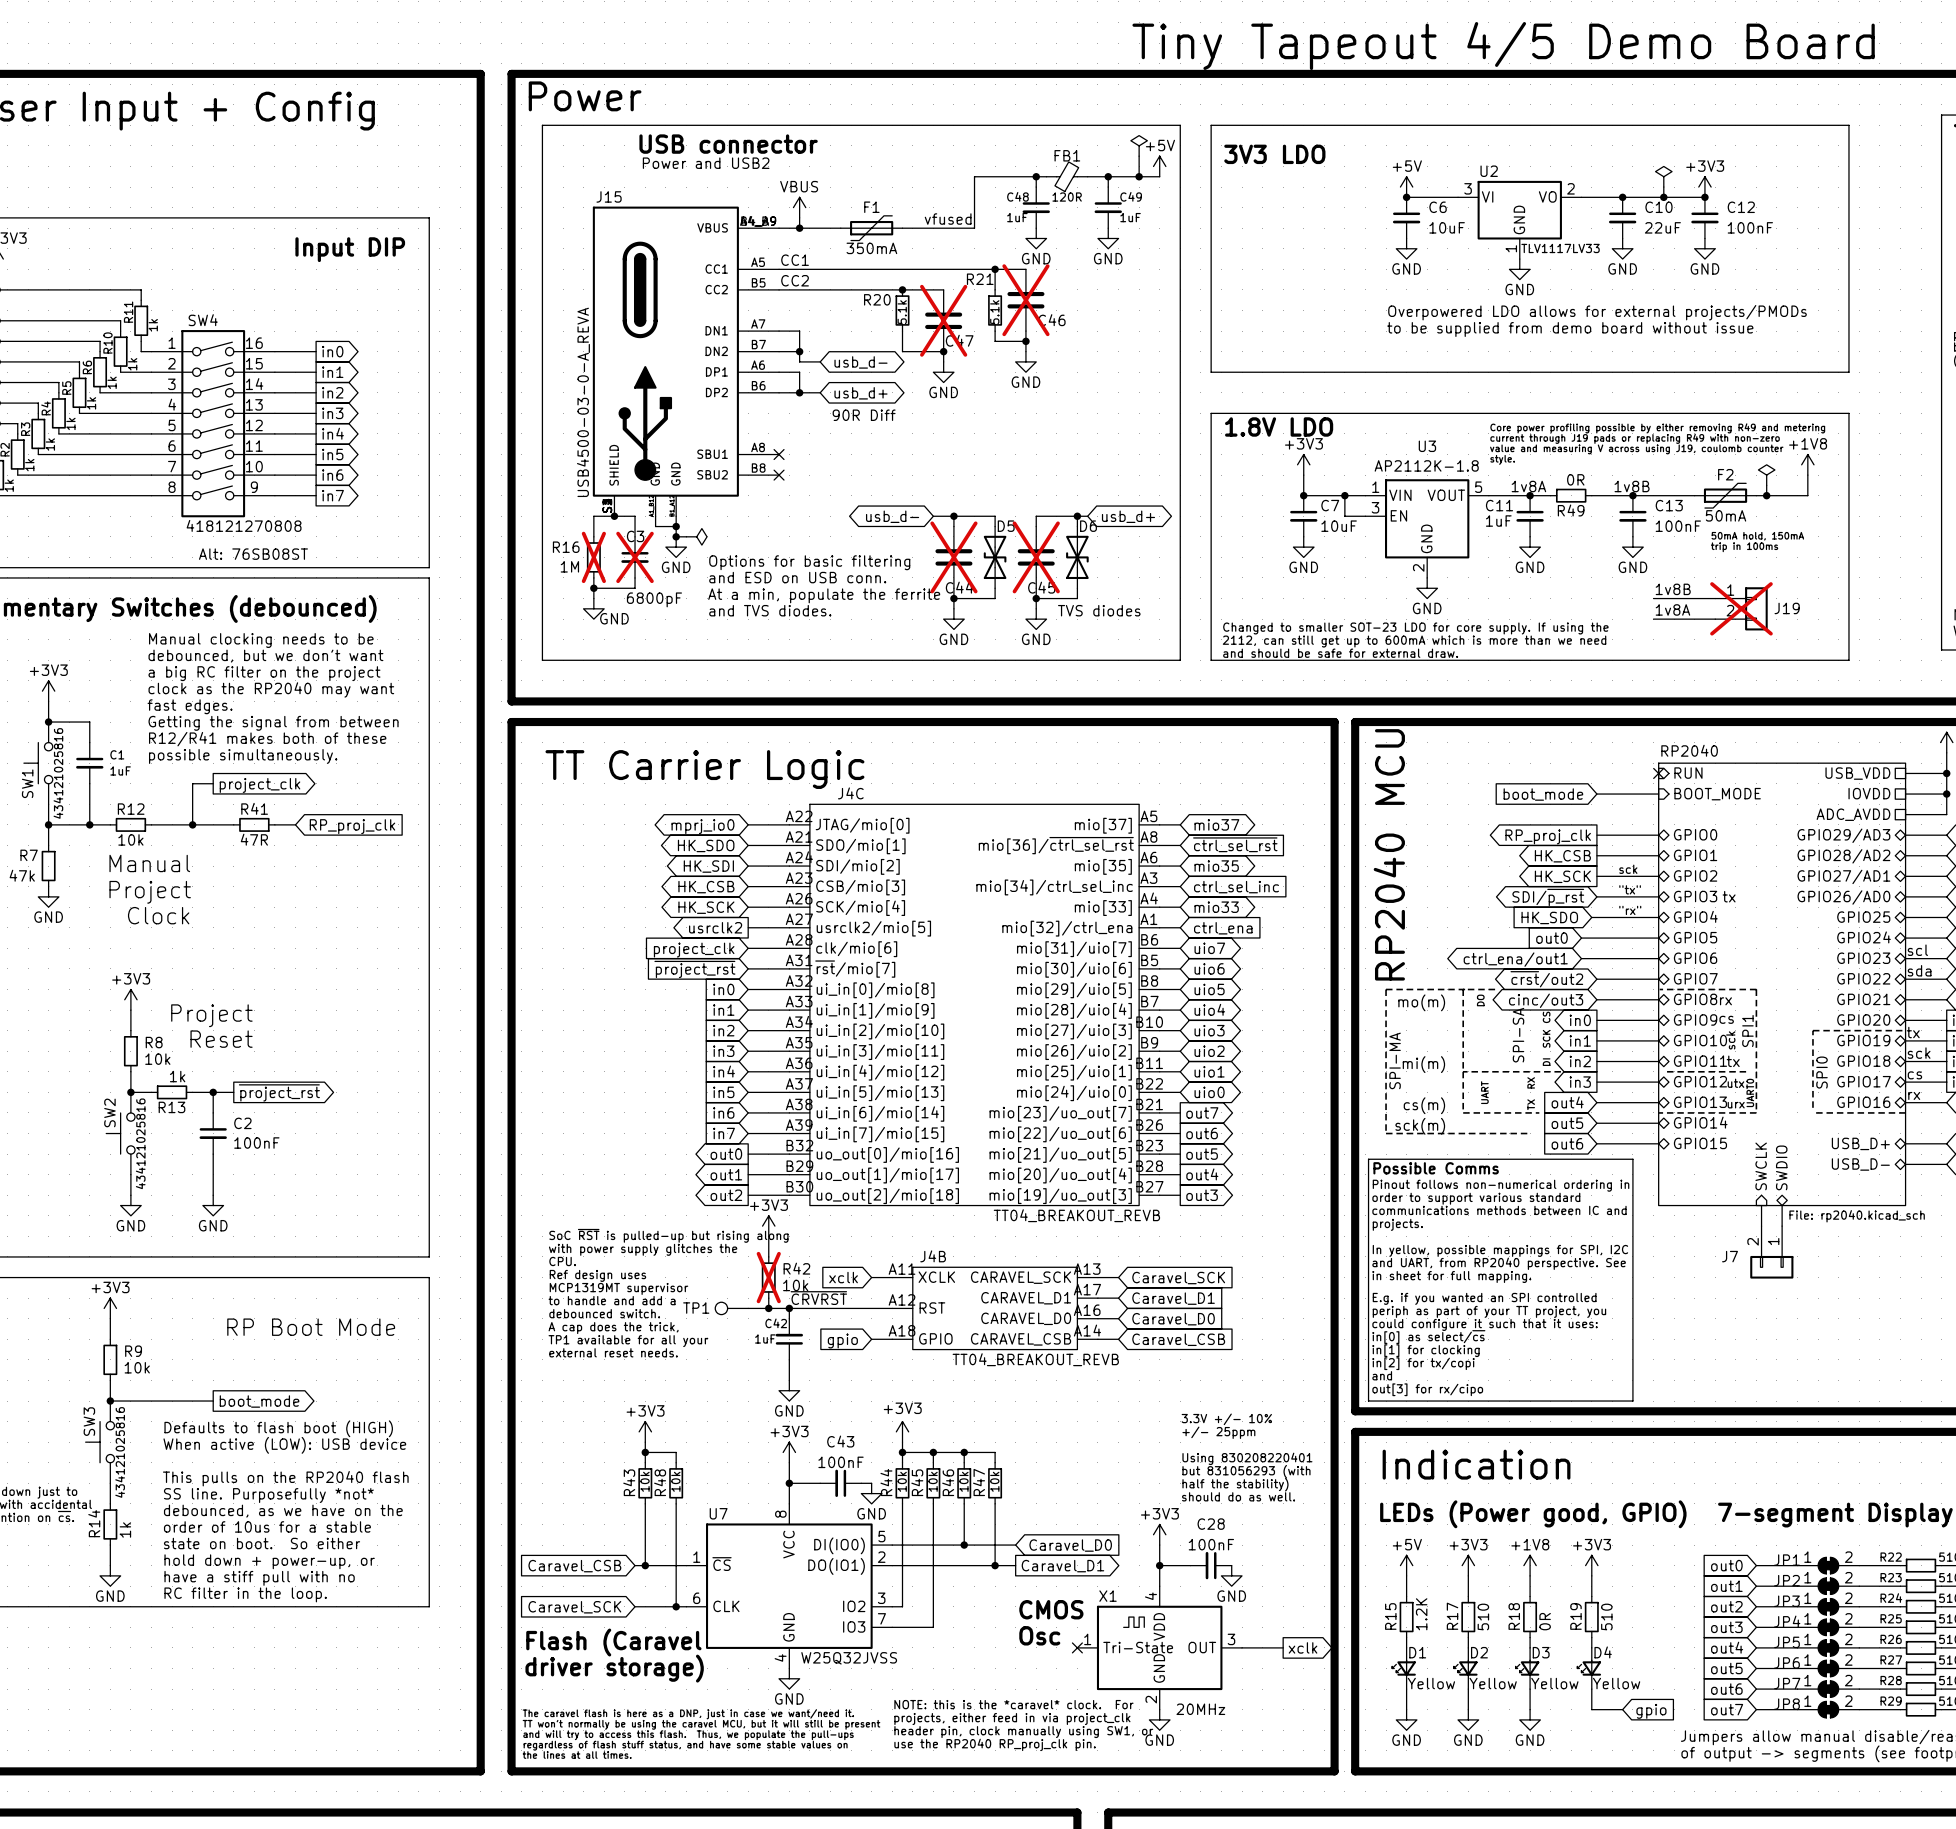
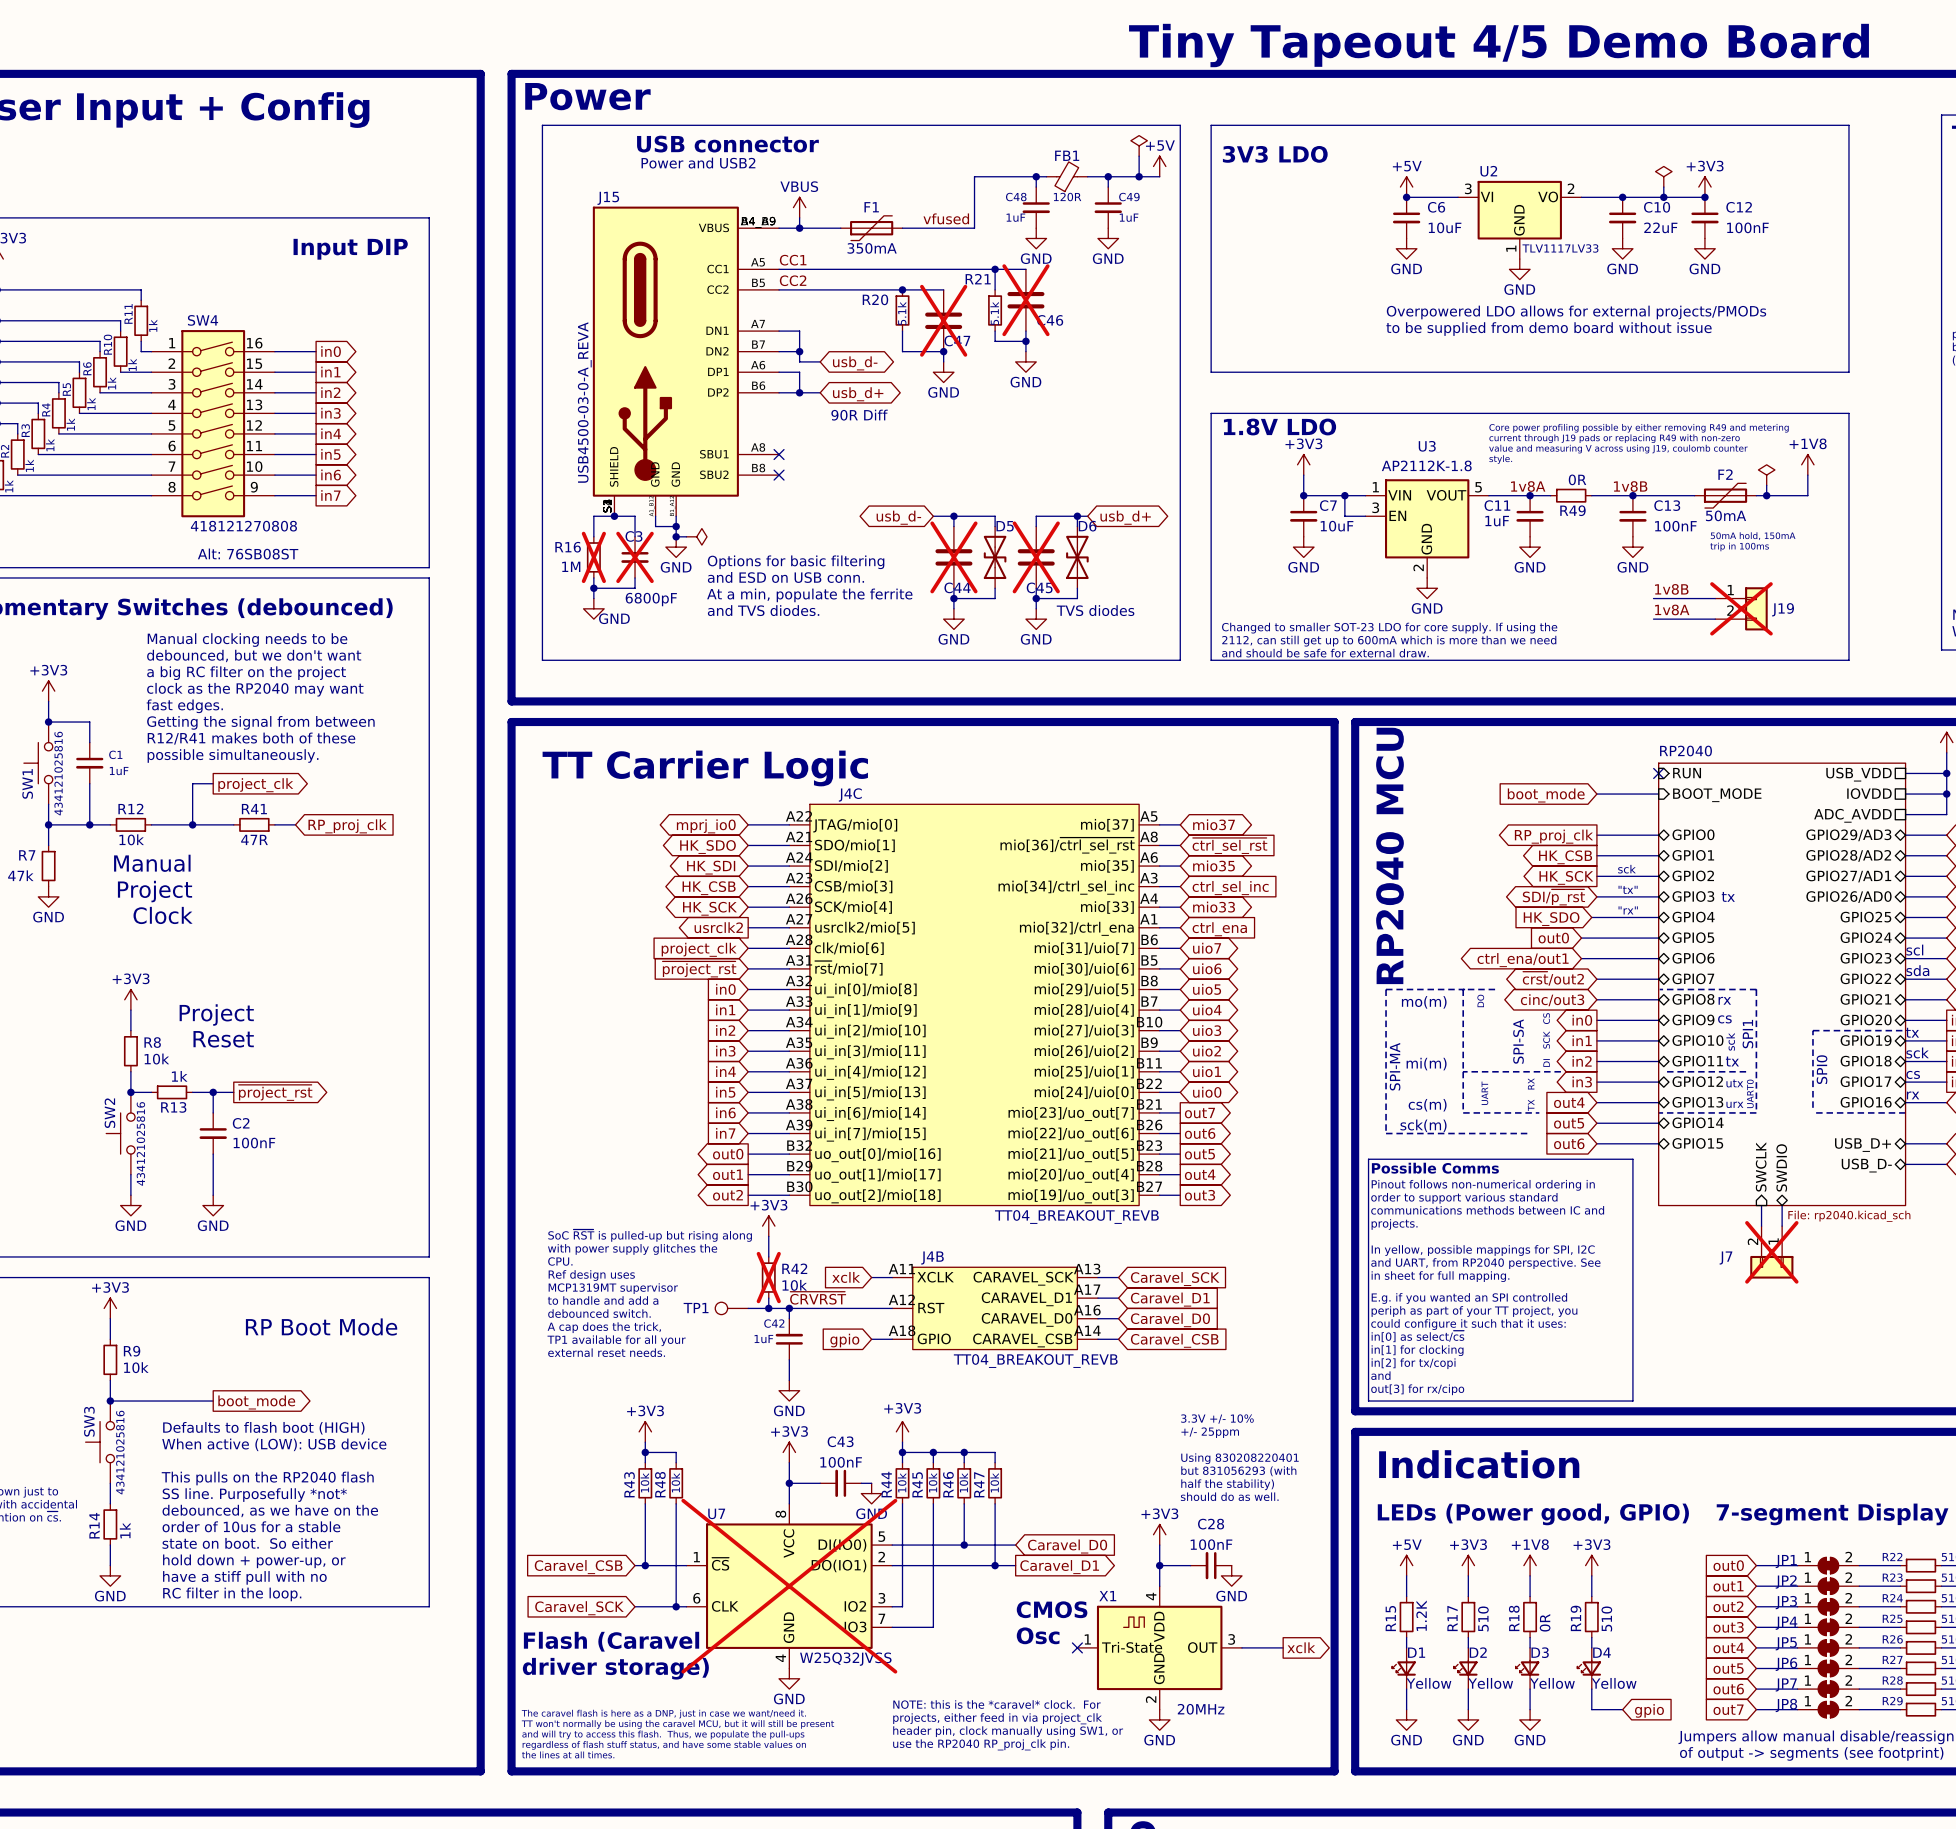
J7 do-not-place cross: none -> (1771, 1252)
U7 do-not-place cross: none -> (789, 1586)

